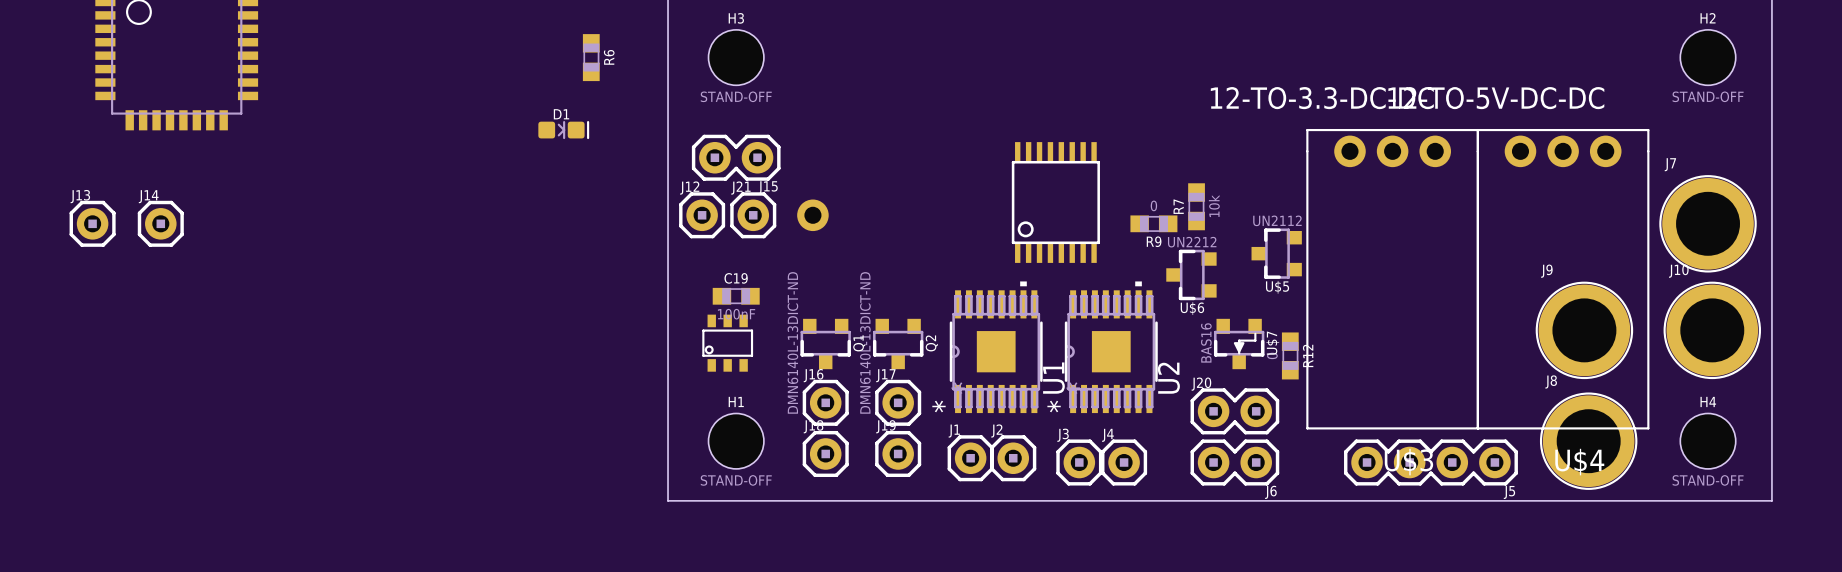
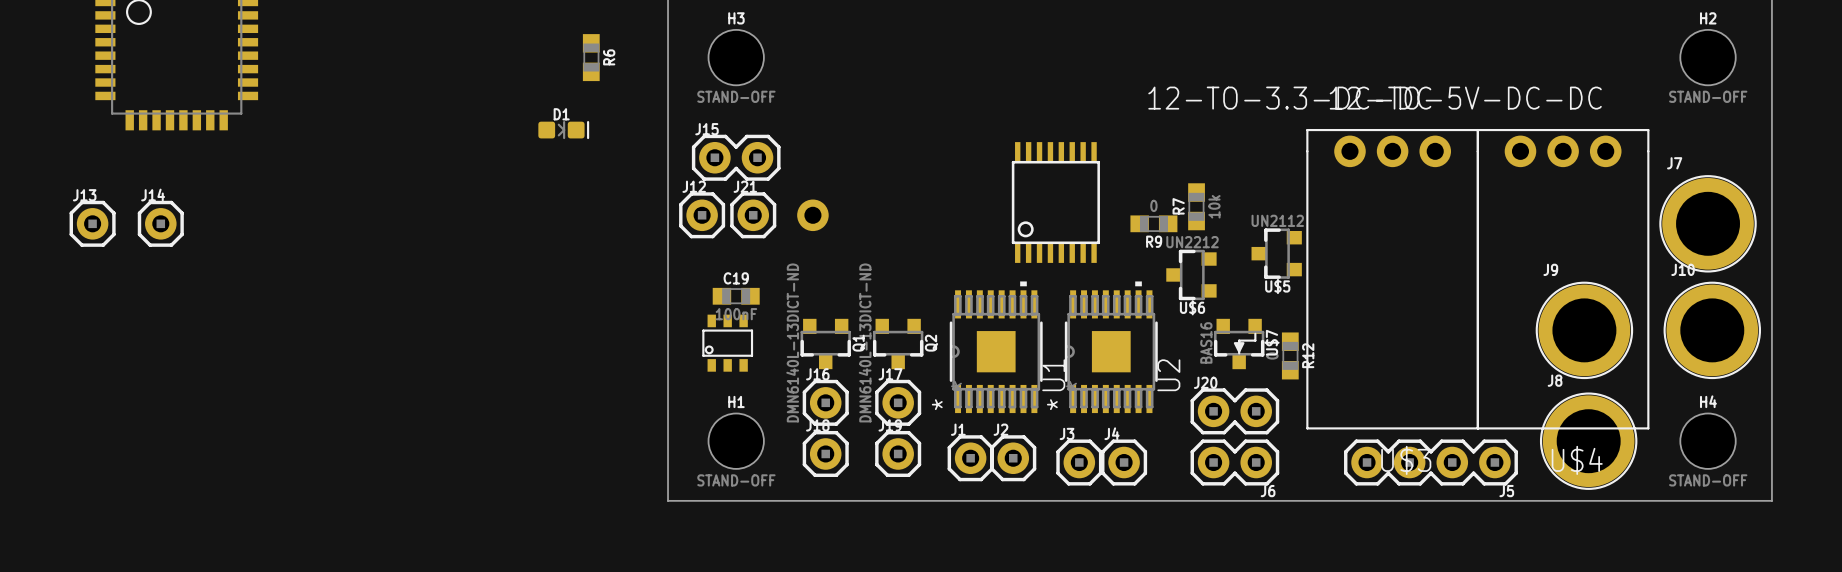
J15 name position: J15 (768, 187) -> J15 (706, 129)

